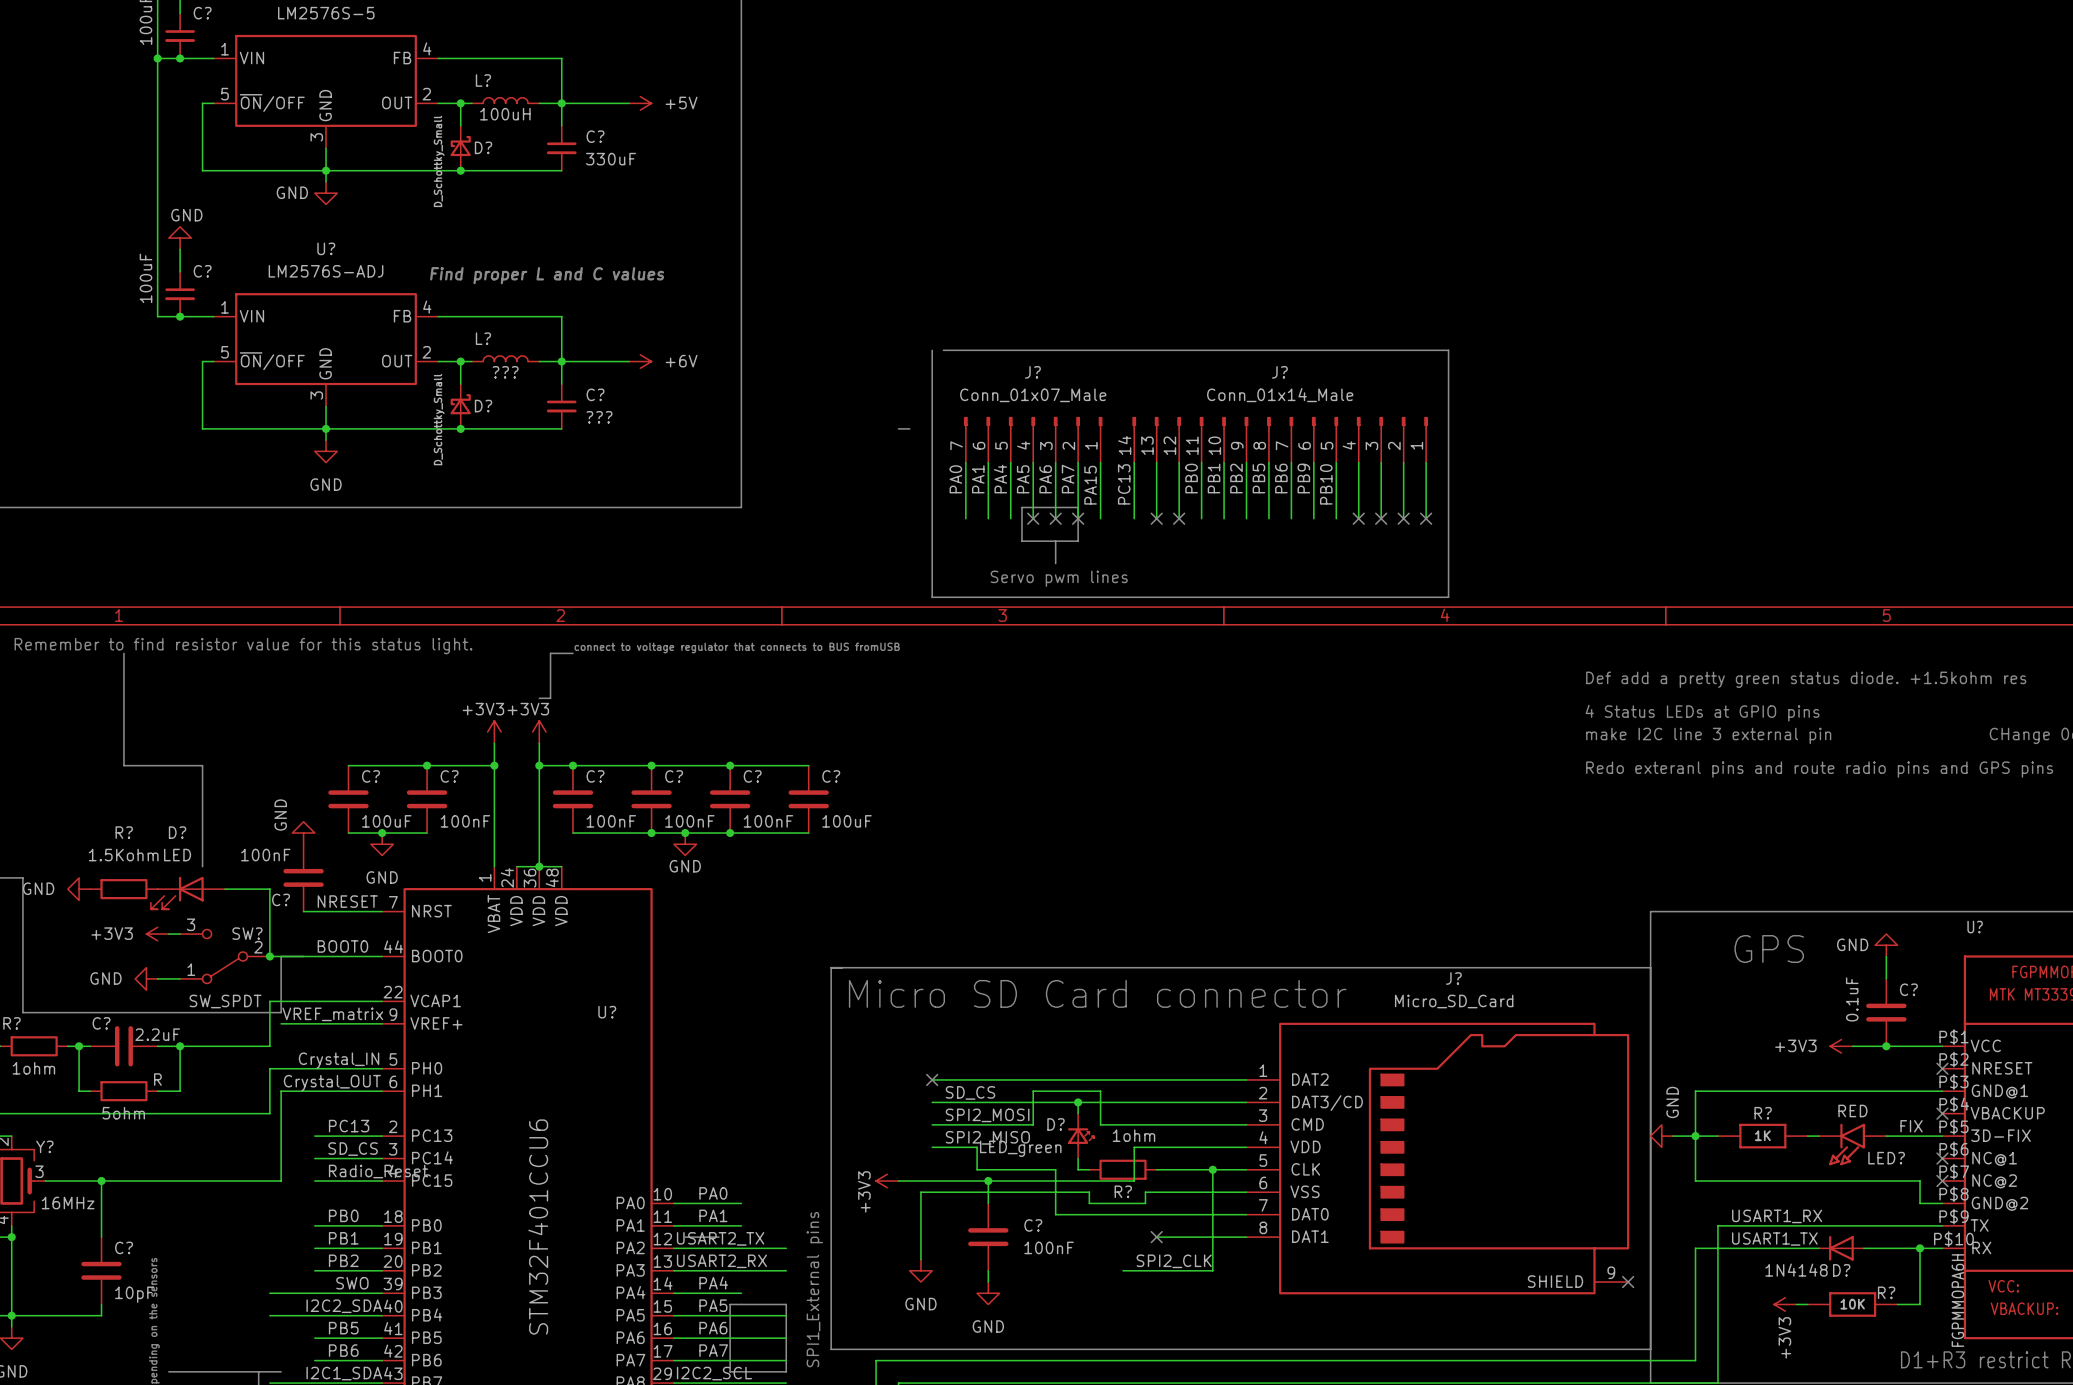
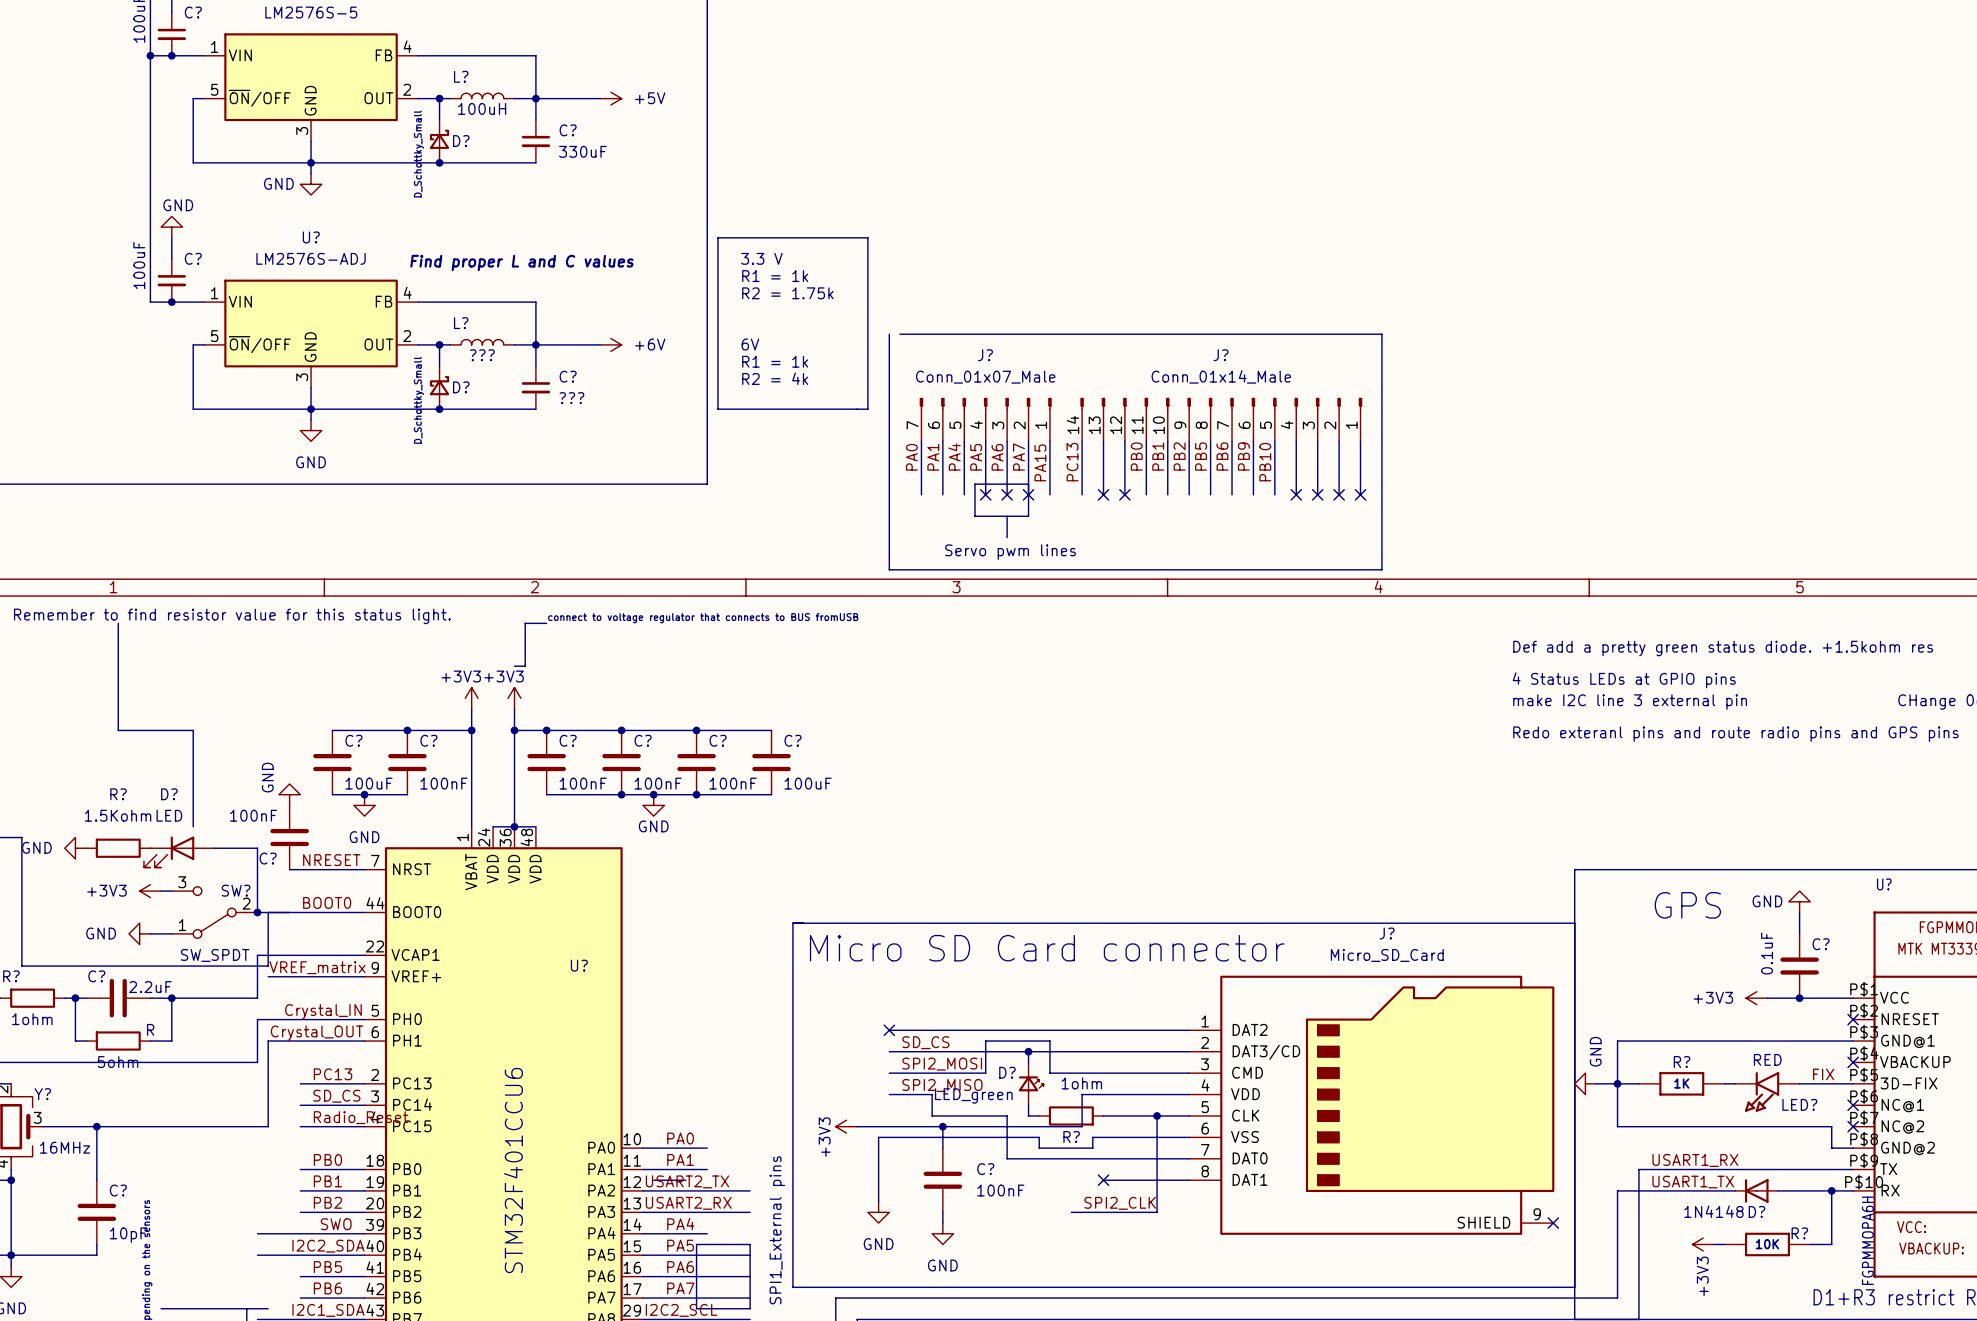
text: none -> 3.3 V (761, 258)
text: none -> R1 = 1k (775, 276)
text: none -> R2 = 1.75k (787, 293)
text: none -> 6V (750, 344)
text: none -> R1 = 1k (775, 361)
text: none -> R2 = 4k (775, 378)
line: none -> (857, 409) (717, 409) (717, 237) (867, 237) (867, 409)

